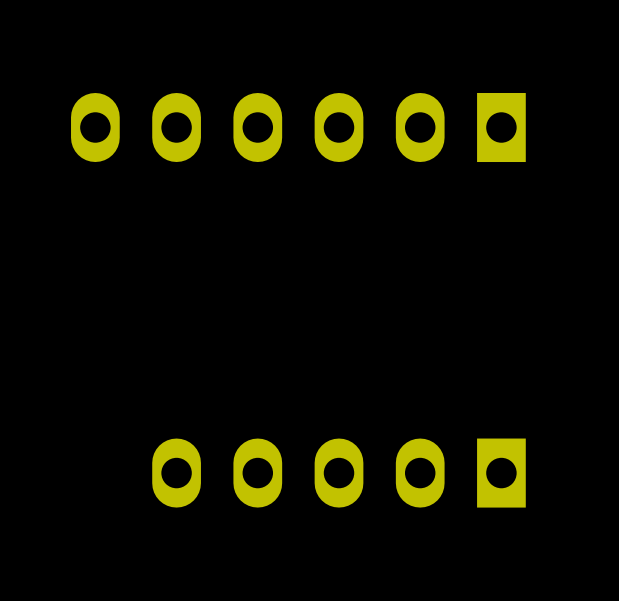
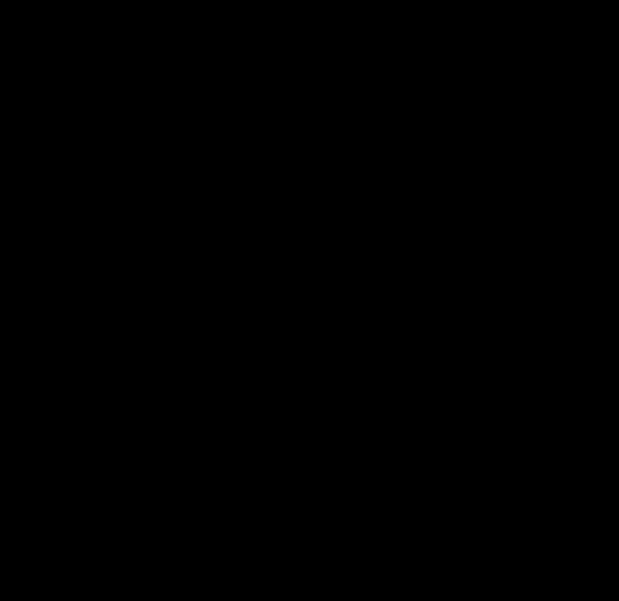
part: (298, 127) -> none
part: (339, 473) -> none

